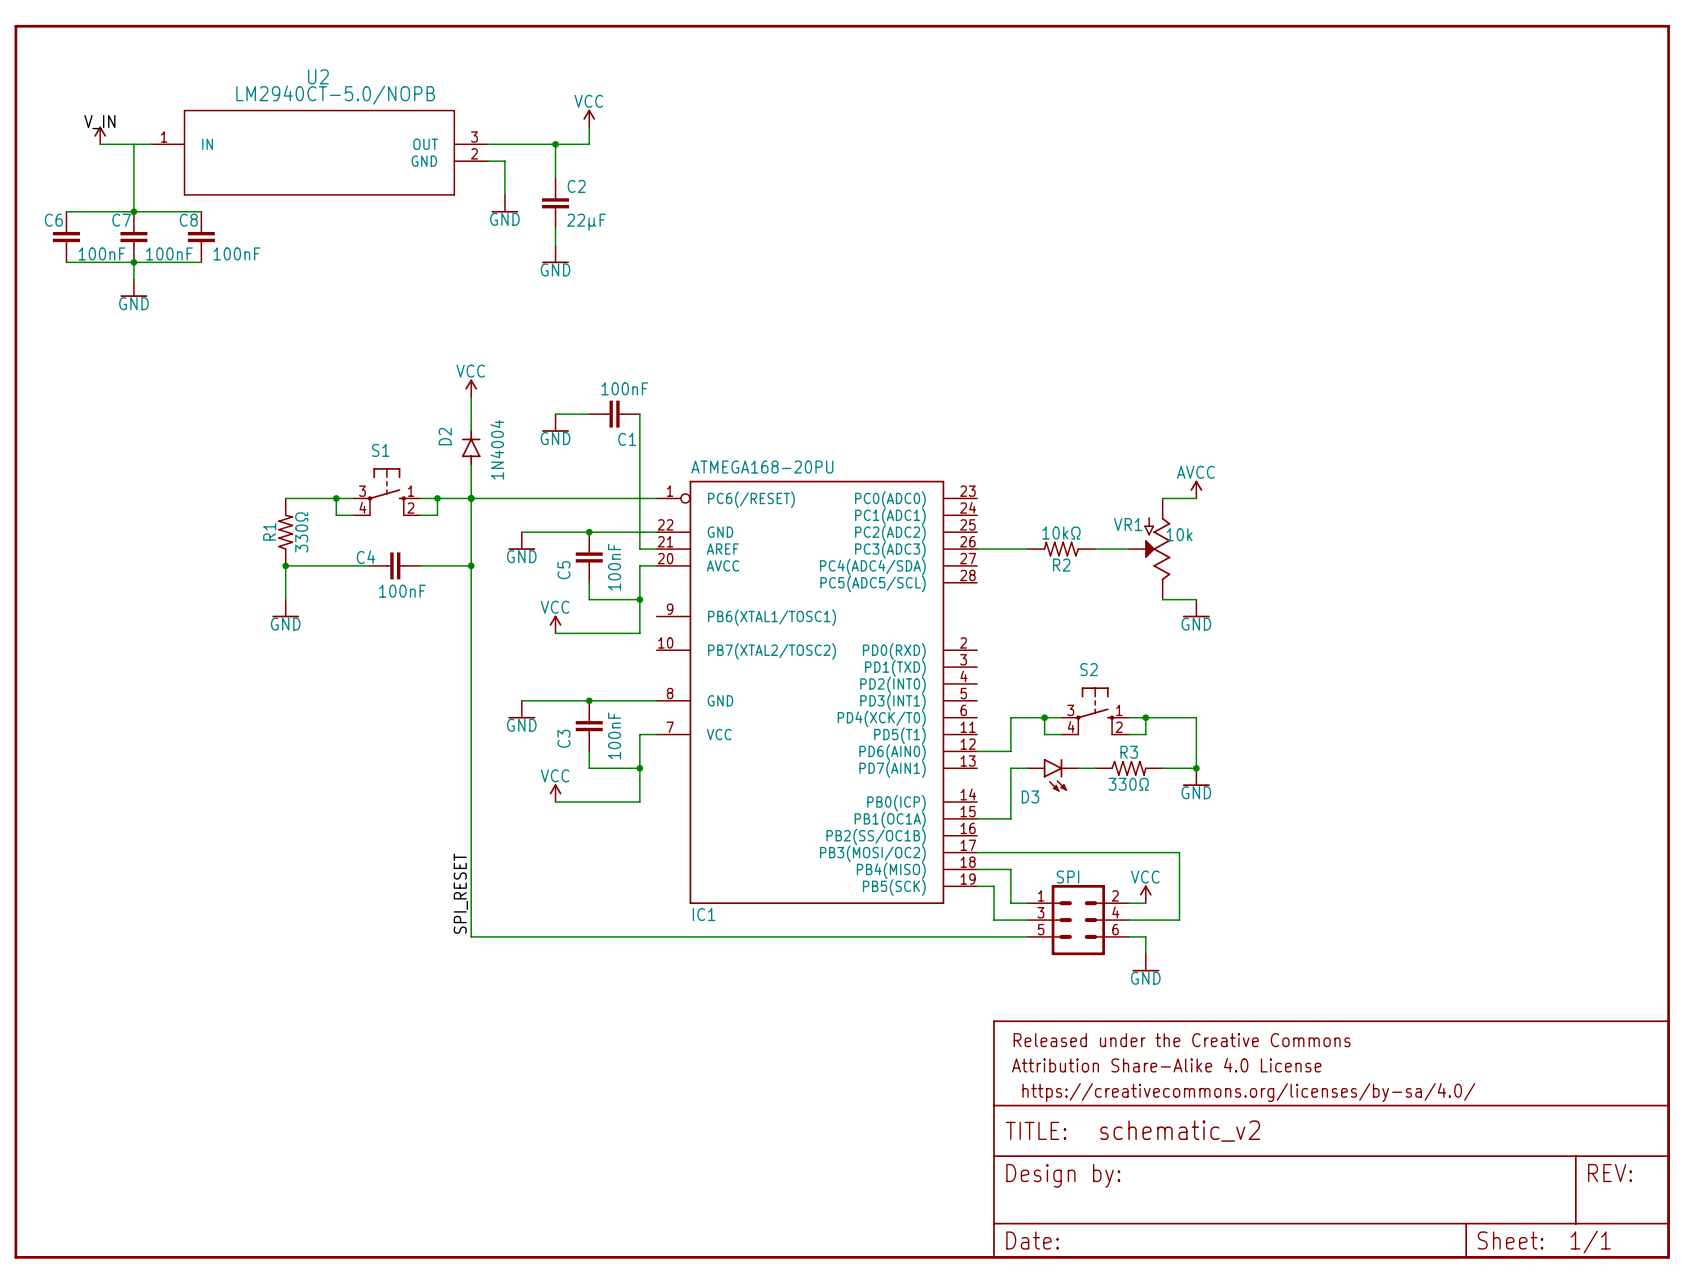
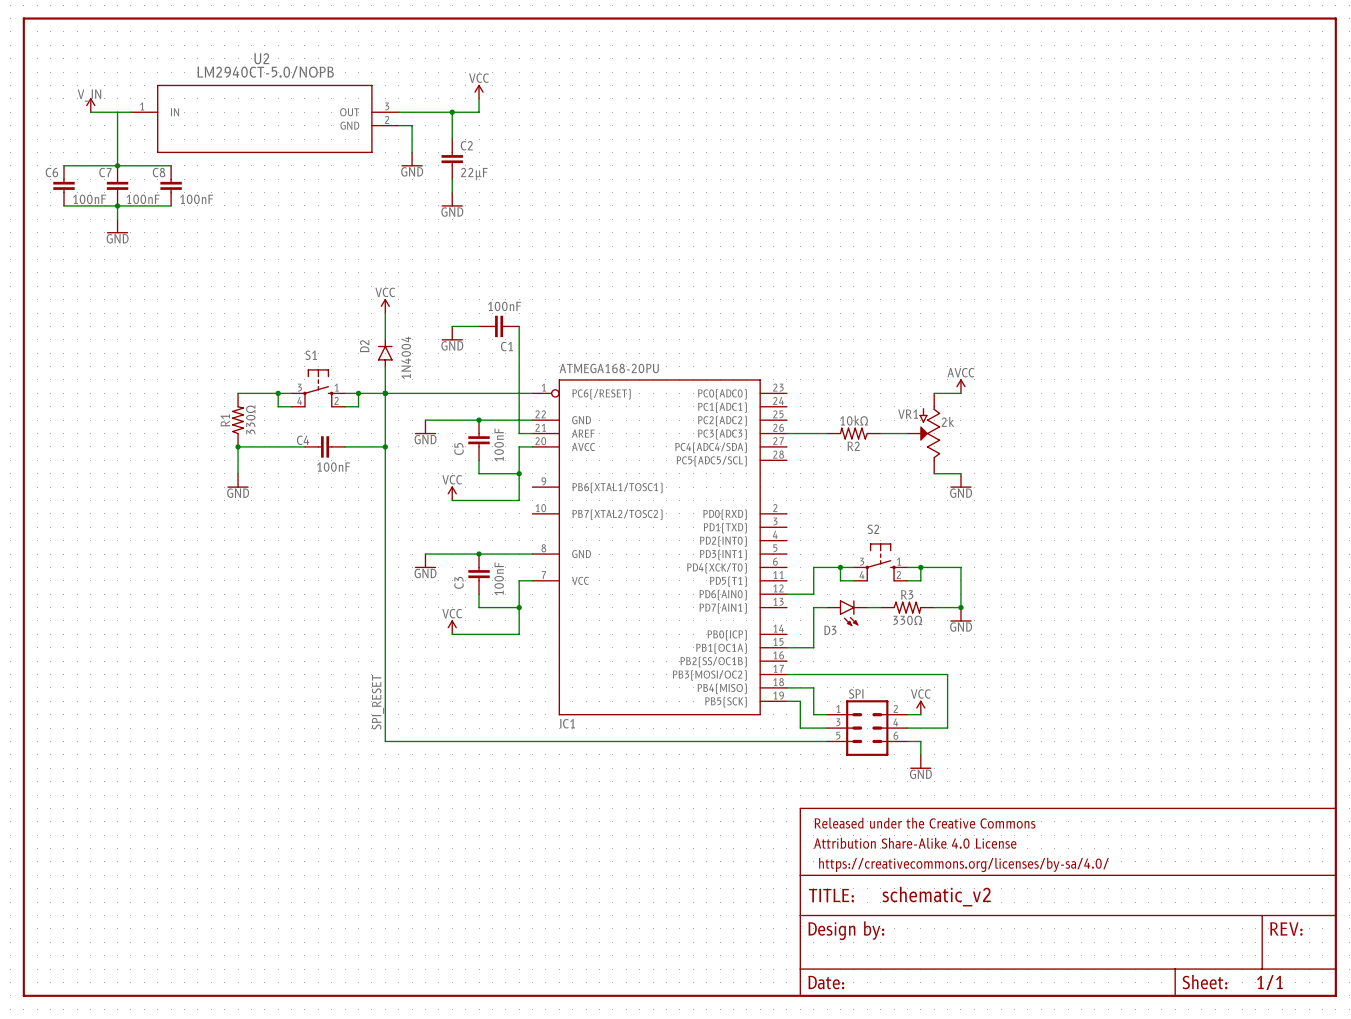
VR1 value: 10k (1179, 534) -> 2k (948, 421)

